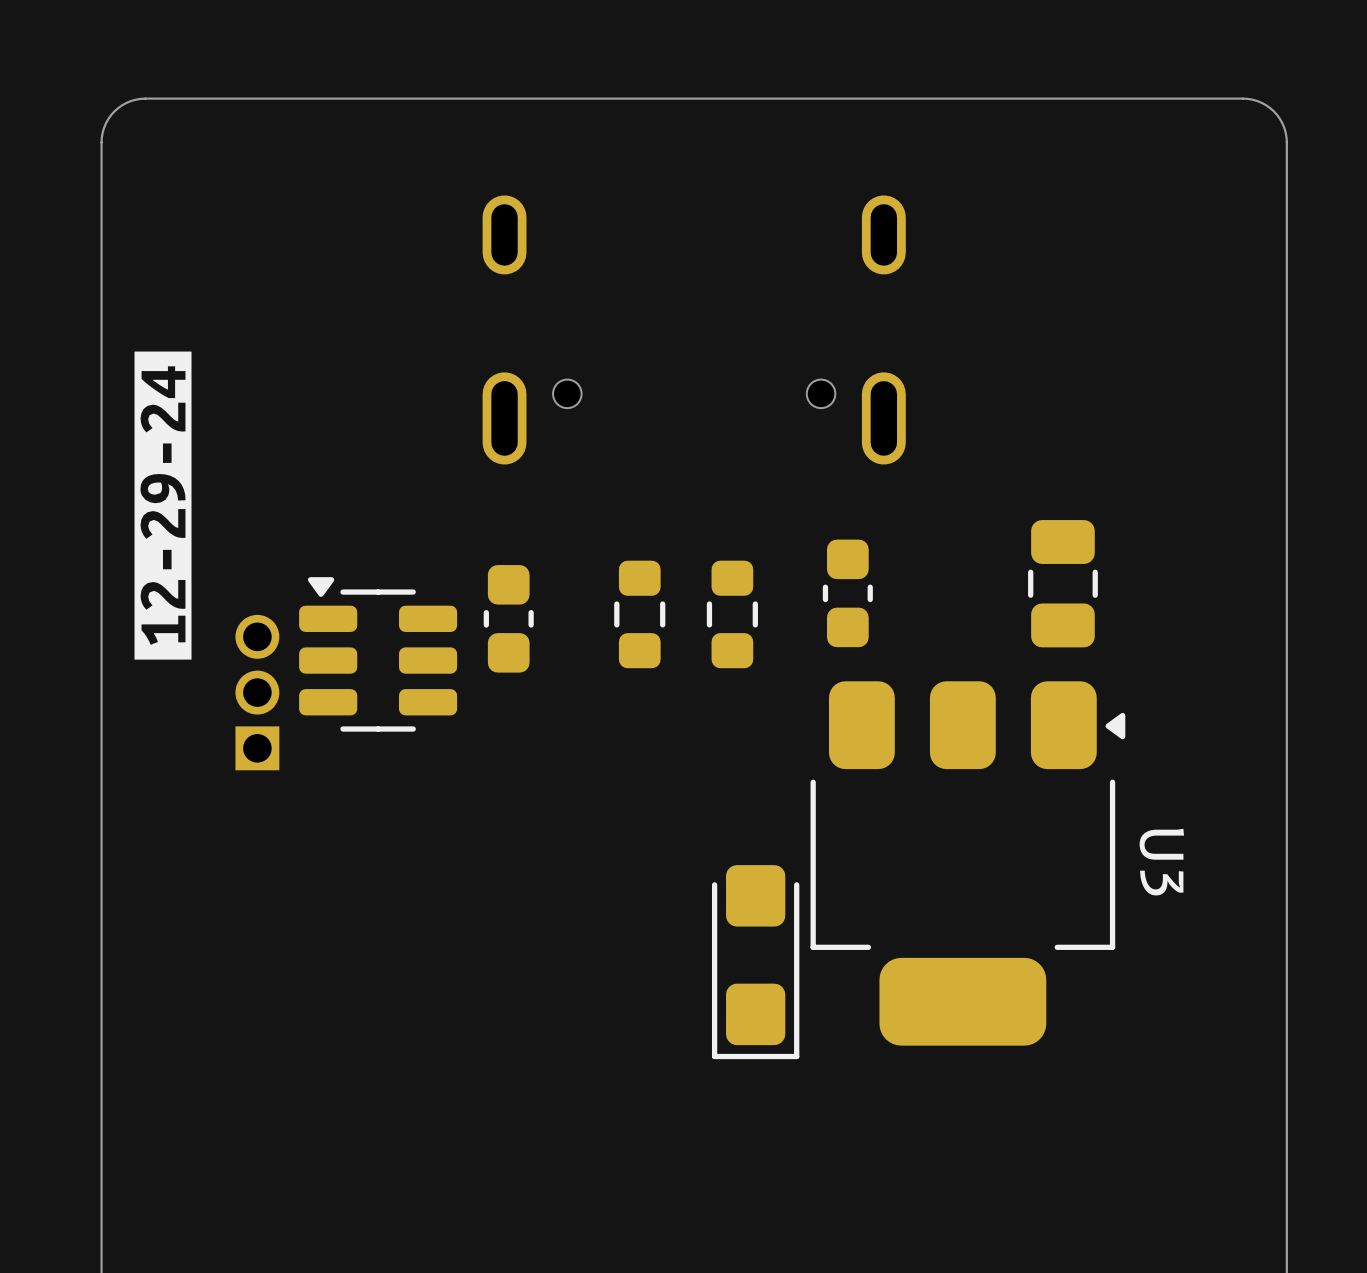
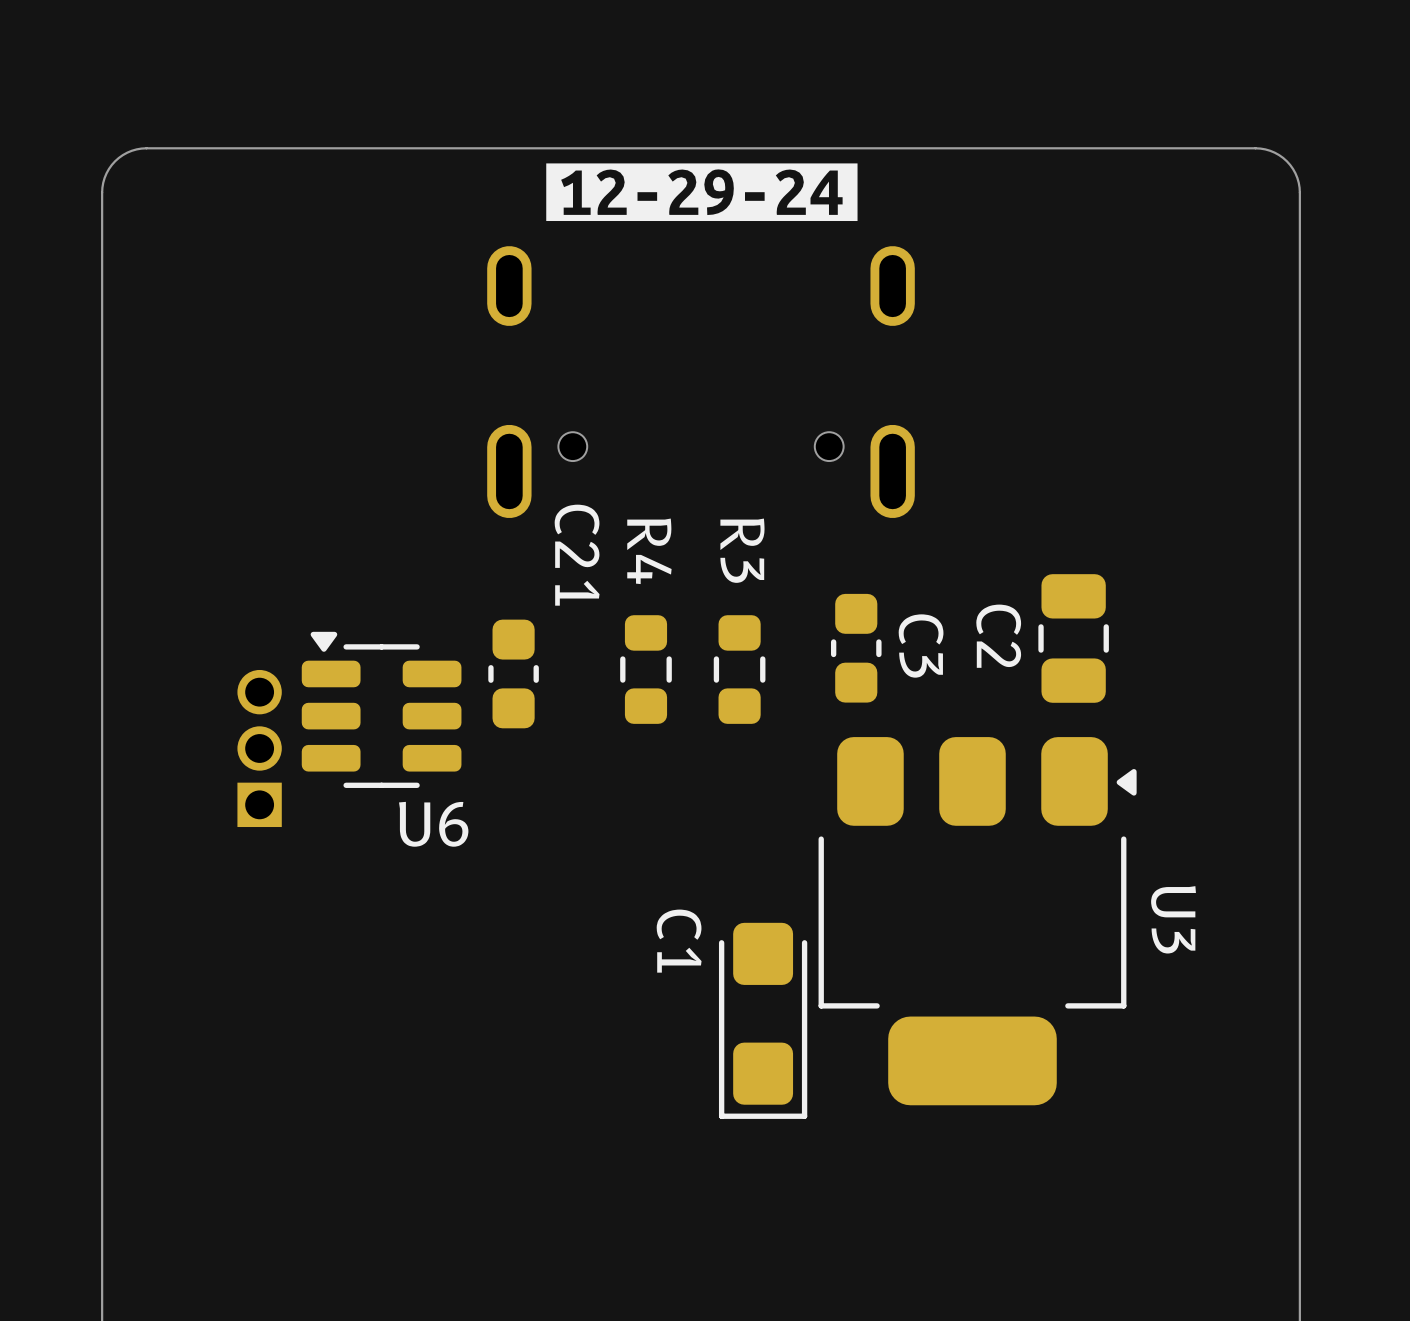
drawing: none -> [546, 163, 858, 222]
drawing: [134, 351, 192, 660] -> none
R3 name: none -> R3 (742, 550)
R4 name: none -> R4 (649, 551)
C21 name: none -> C21 (577, 555)
C2 name: none -> C2 (998, 636)
C3 name: none -> C3 (921, 646)
U6 name: none -> U6 (433, 824)
C1 name: none -> C1 (679, 941)

